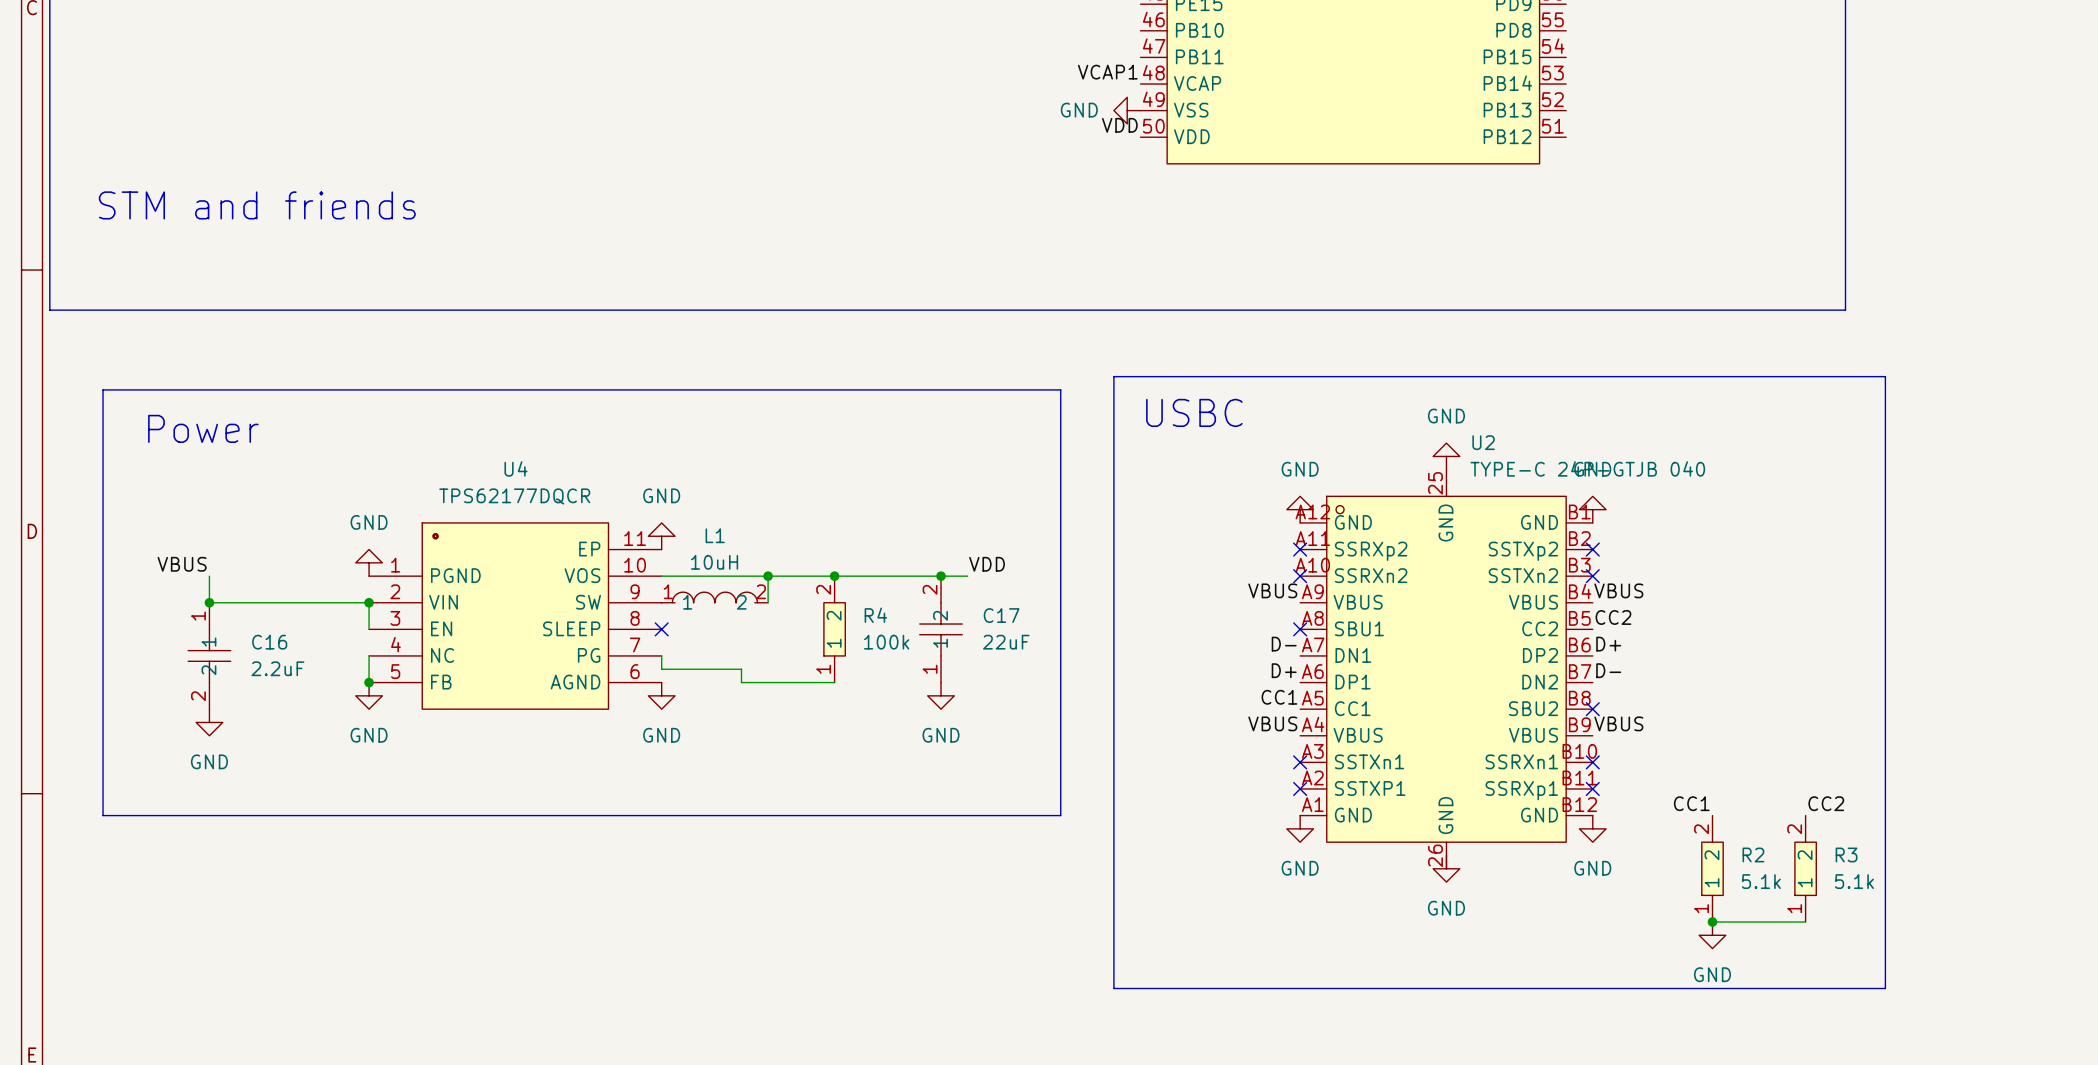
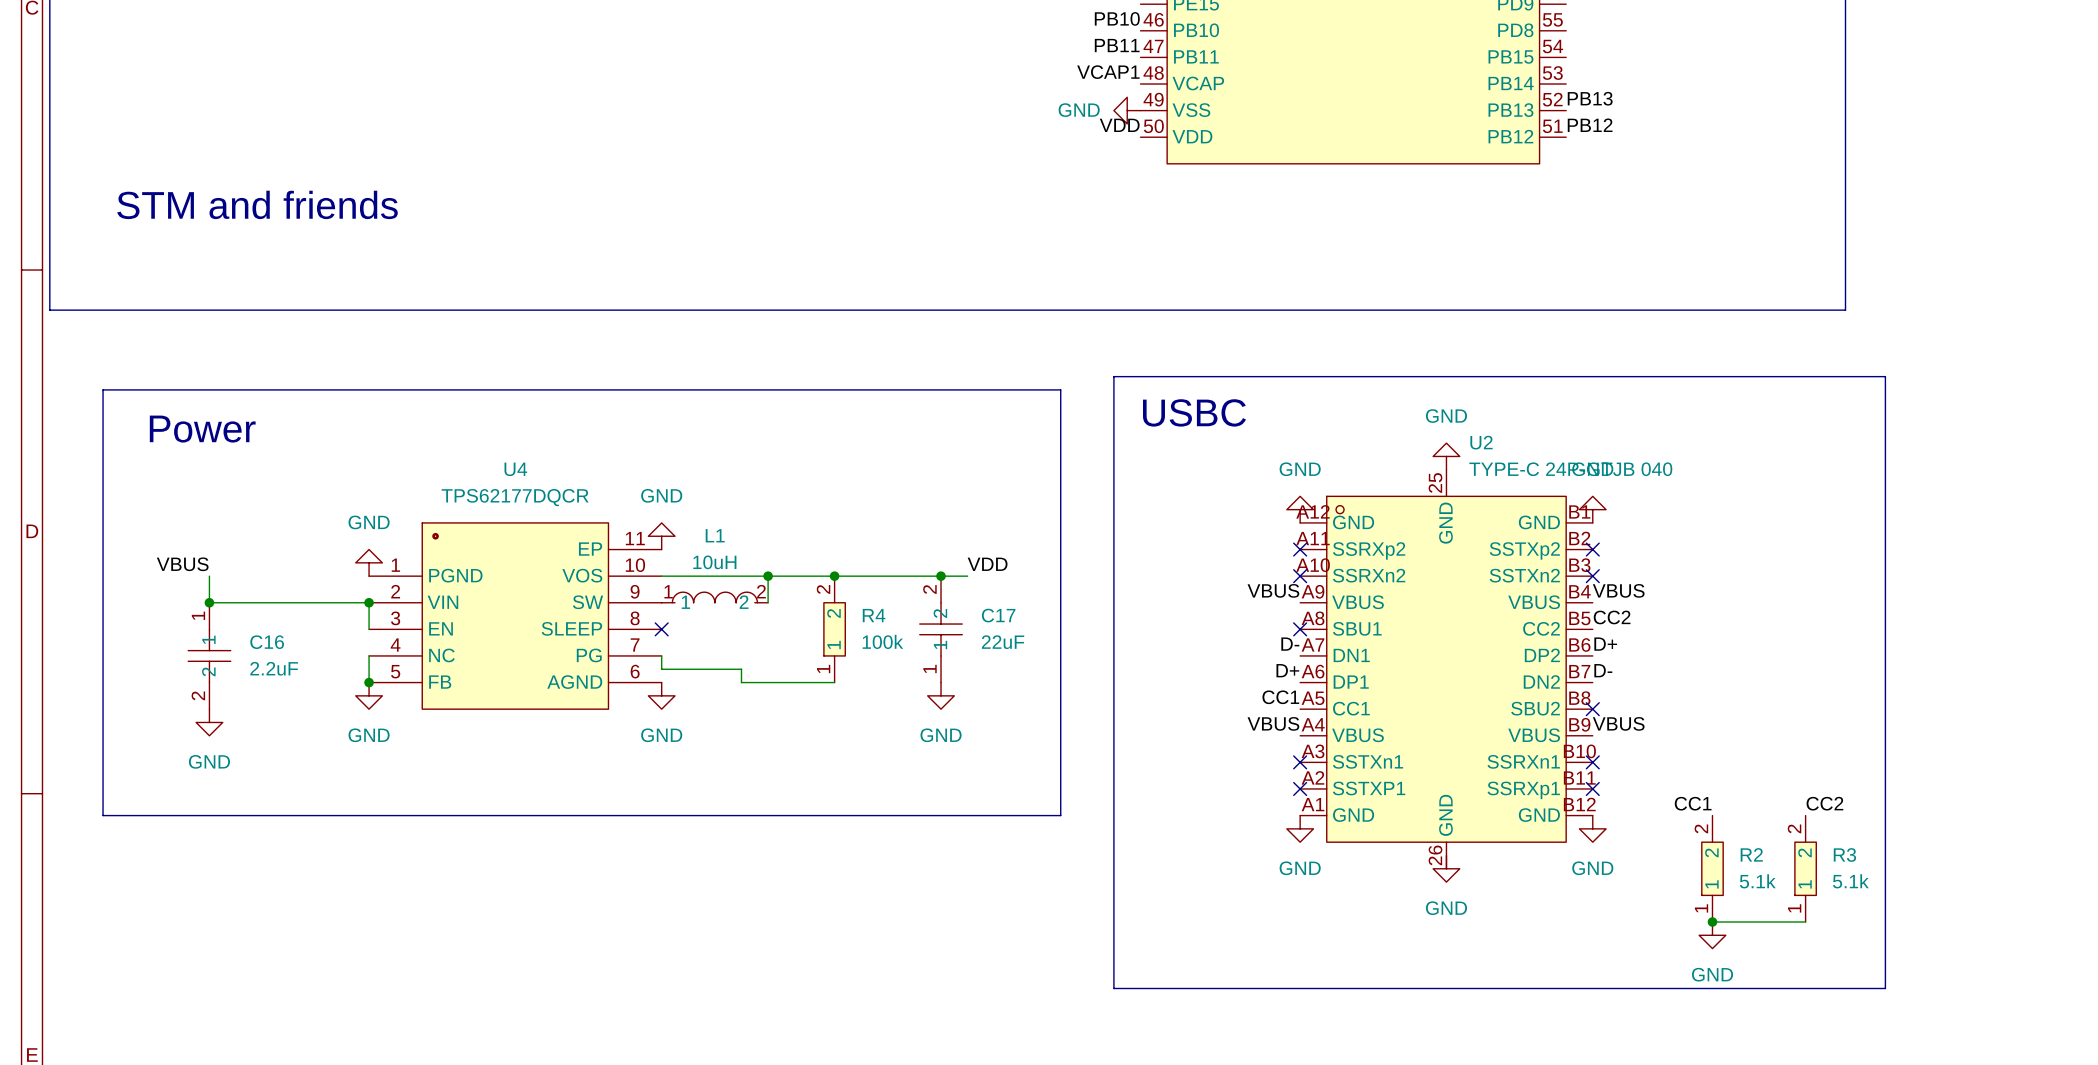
label: none -> PB10 (1117, 18)
label: none -> PB11 (1117, 45)
label: none -> PB13 (1590, 98)
label: none -> PB12 (1590, 125)

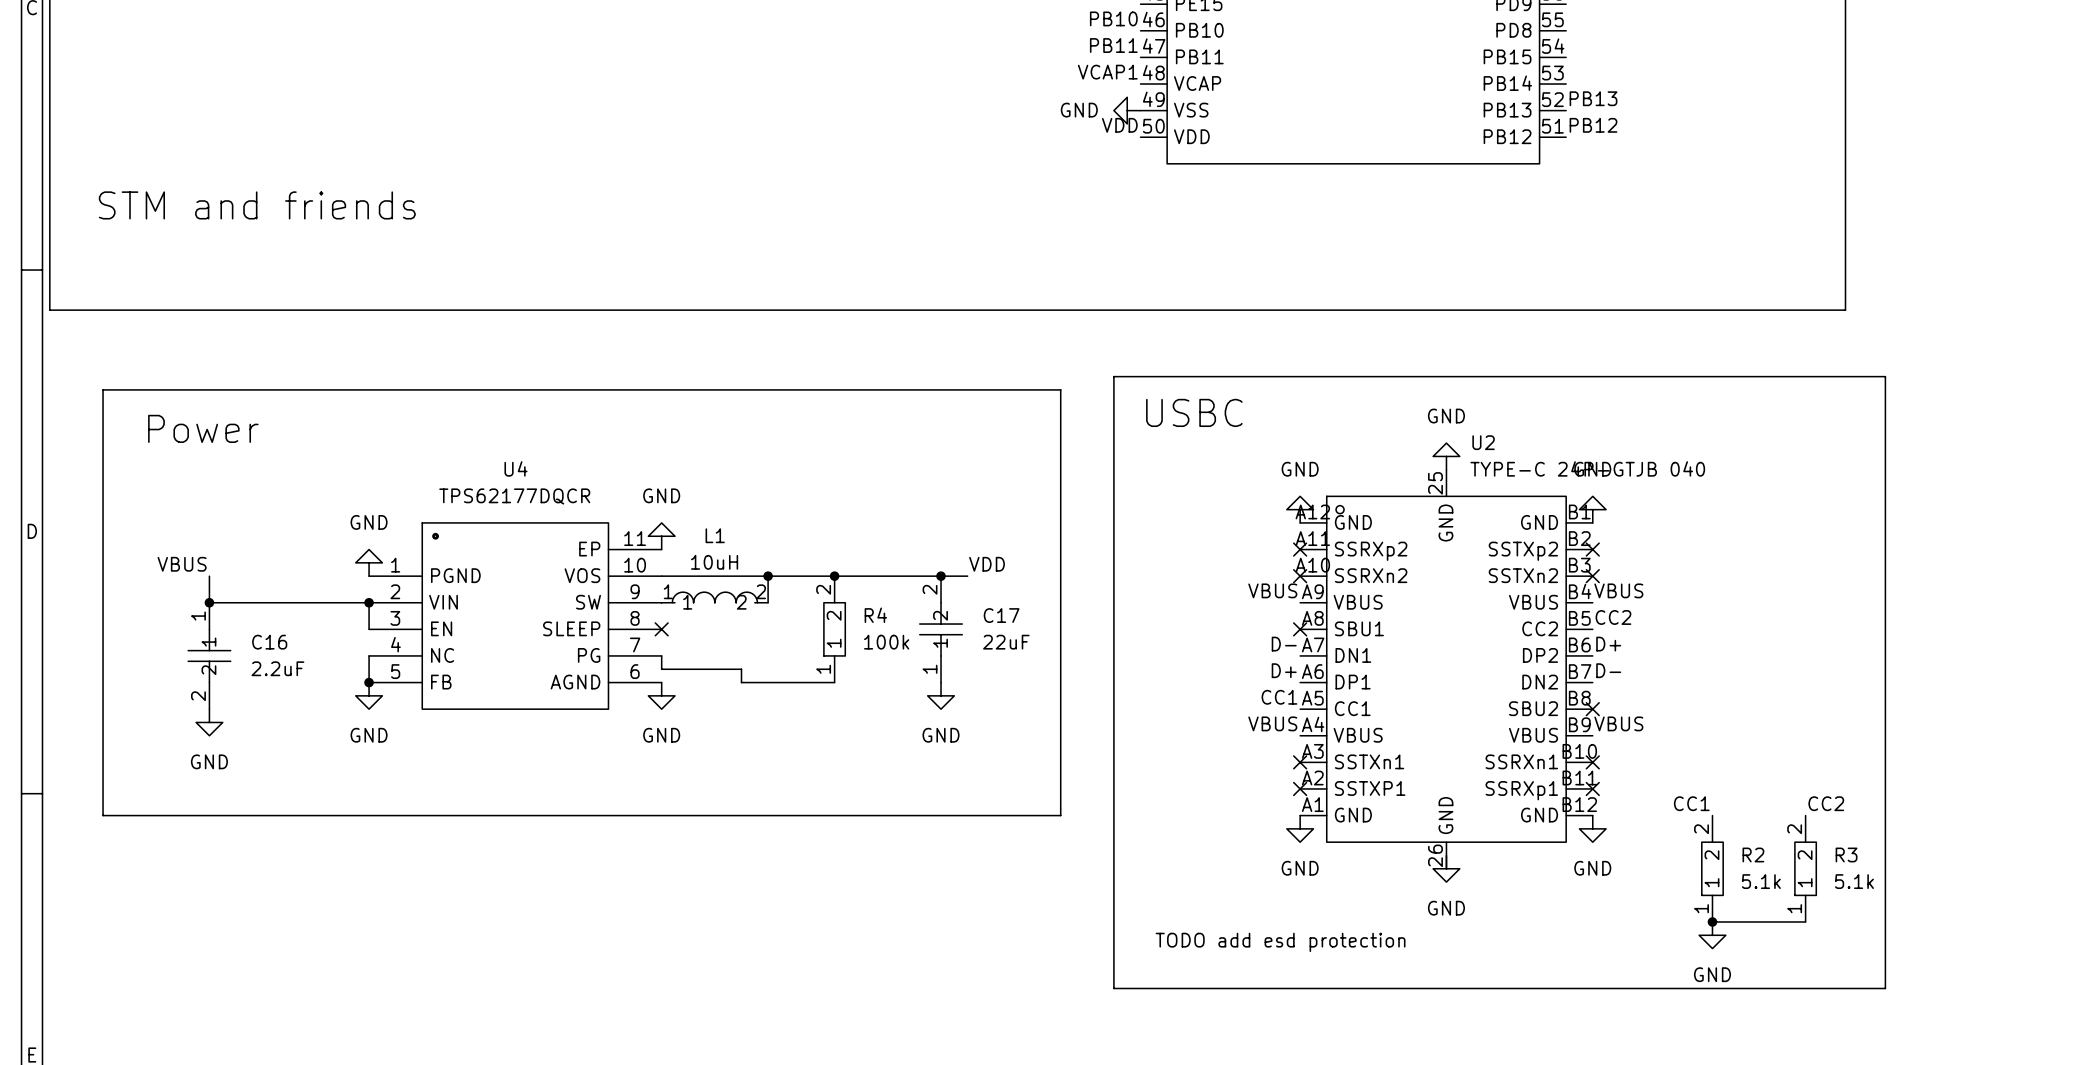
text: none -> TODO add esd protection (1280, 942)

